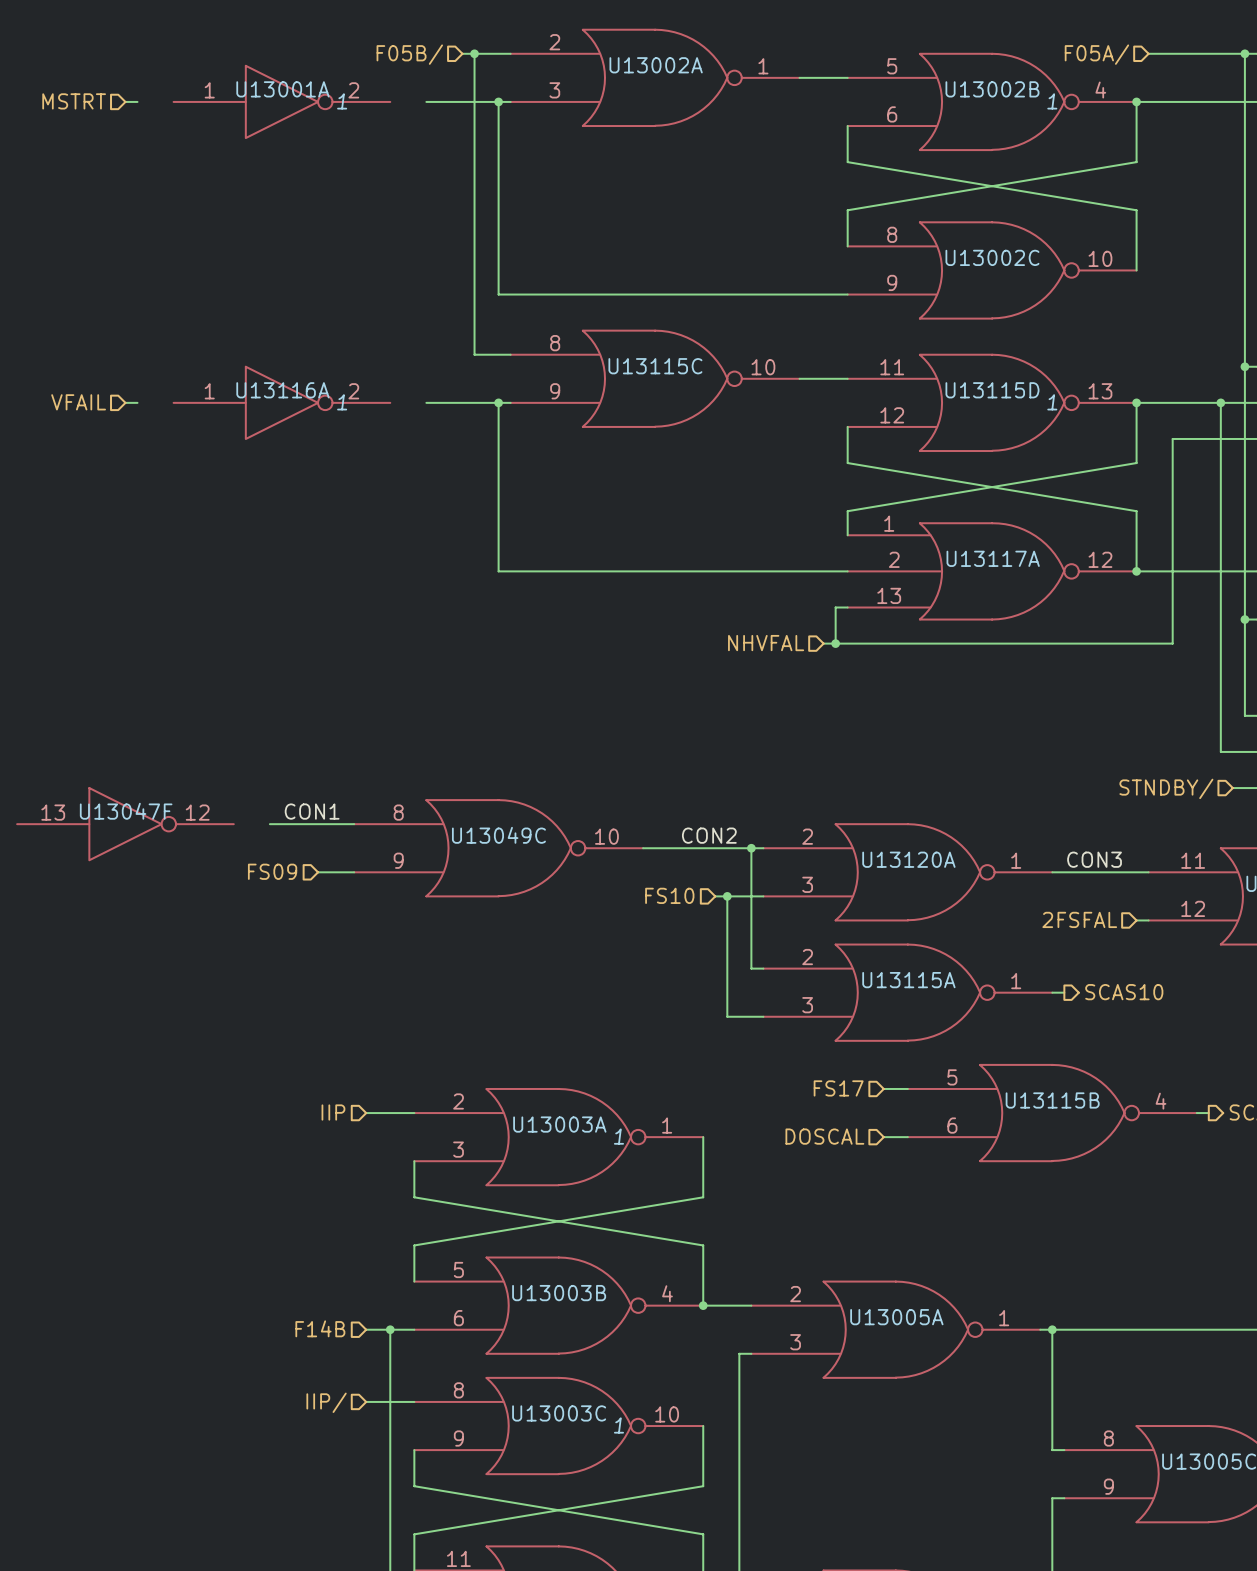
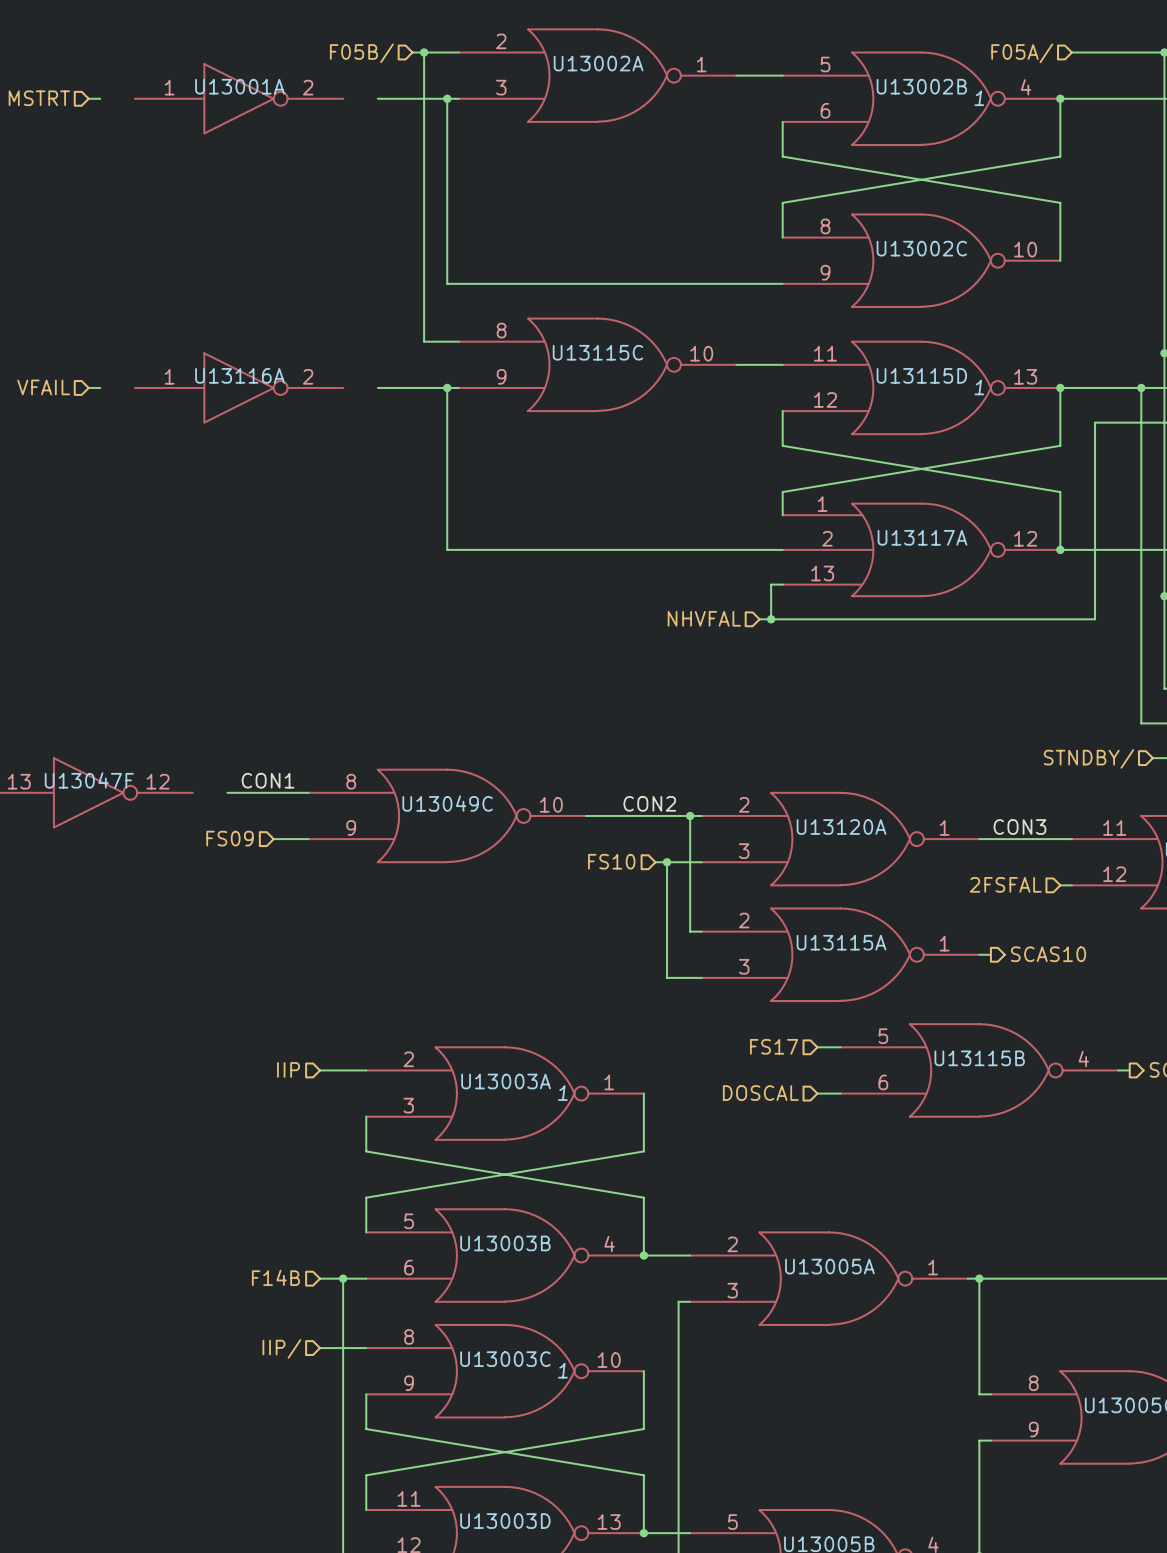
U13001A text: 1 (342, 101) -> none
U13116A text: 1 (342, 402) -> none

